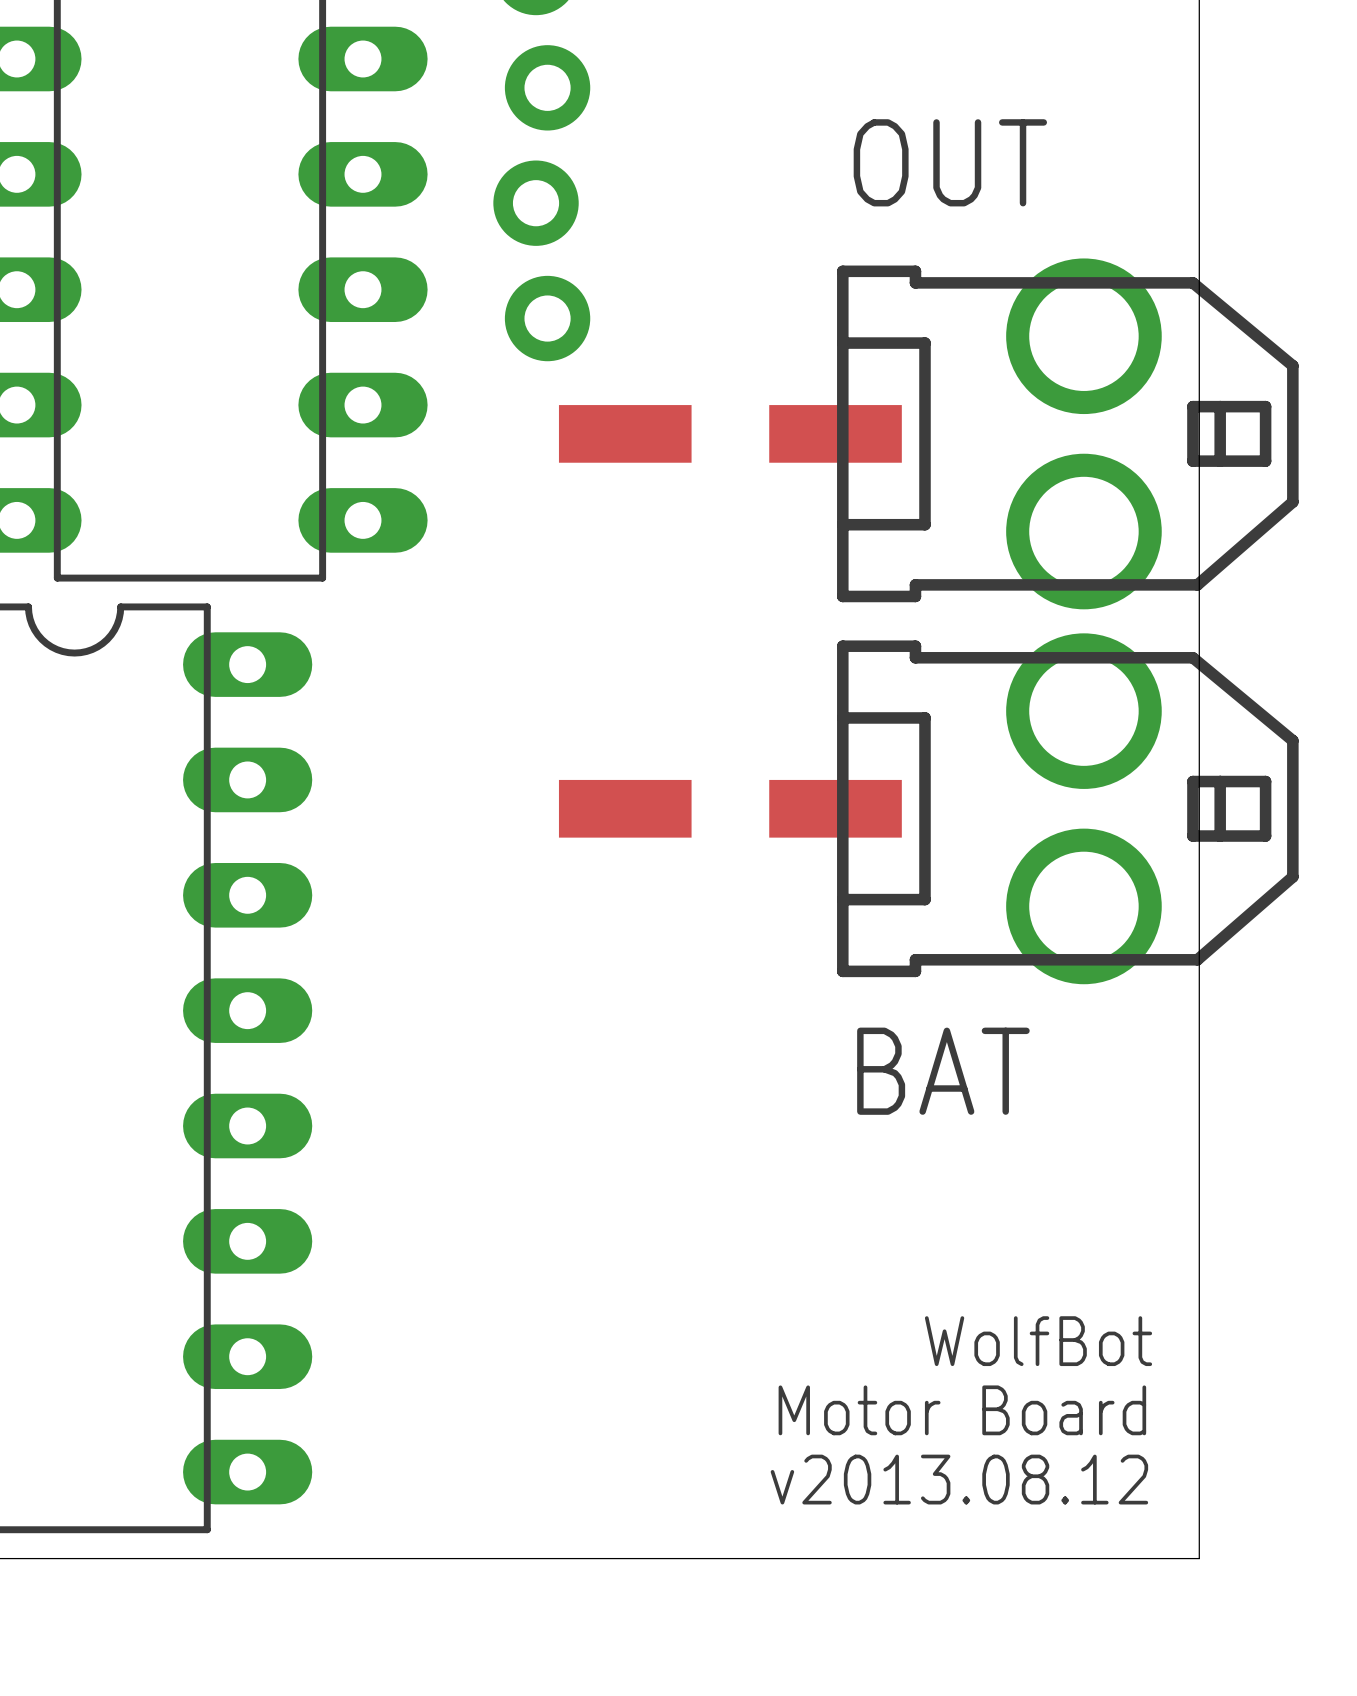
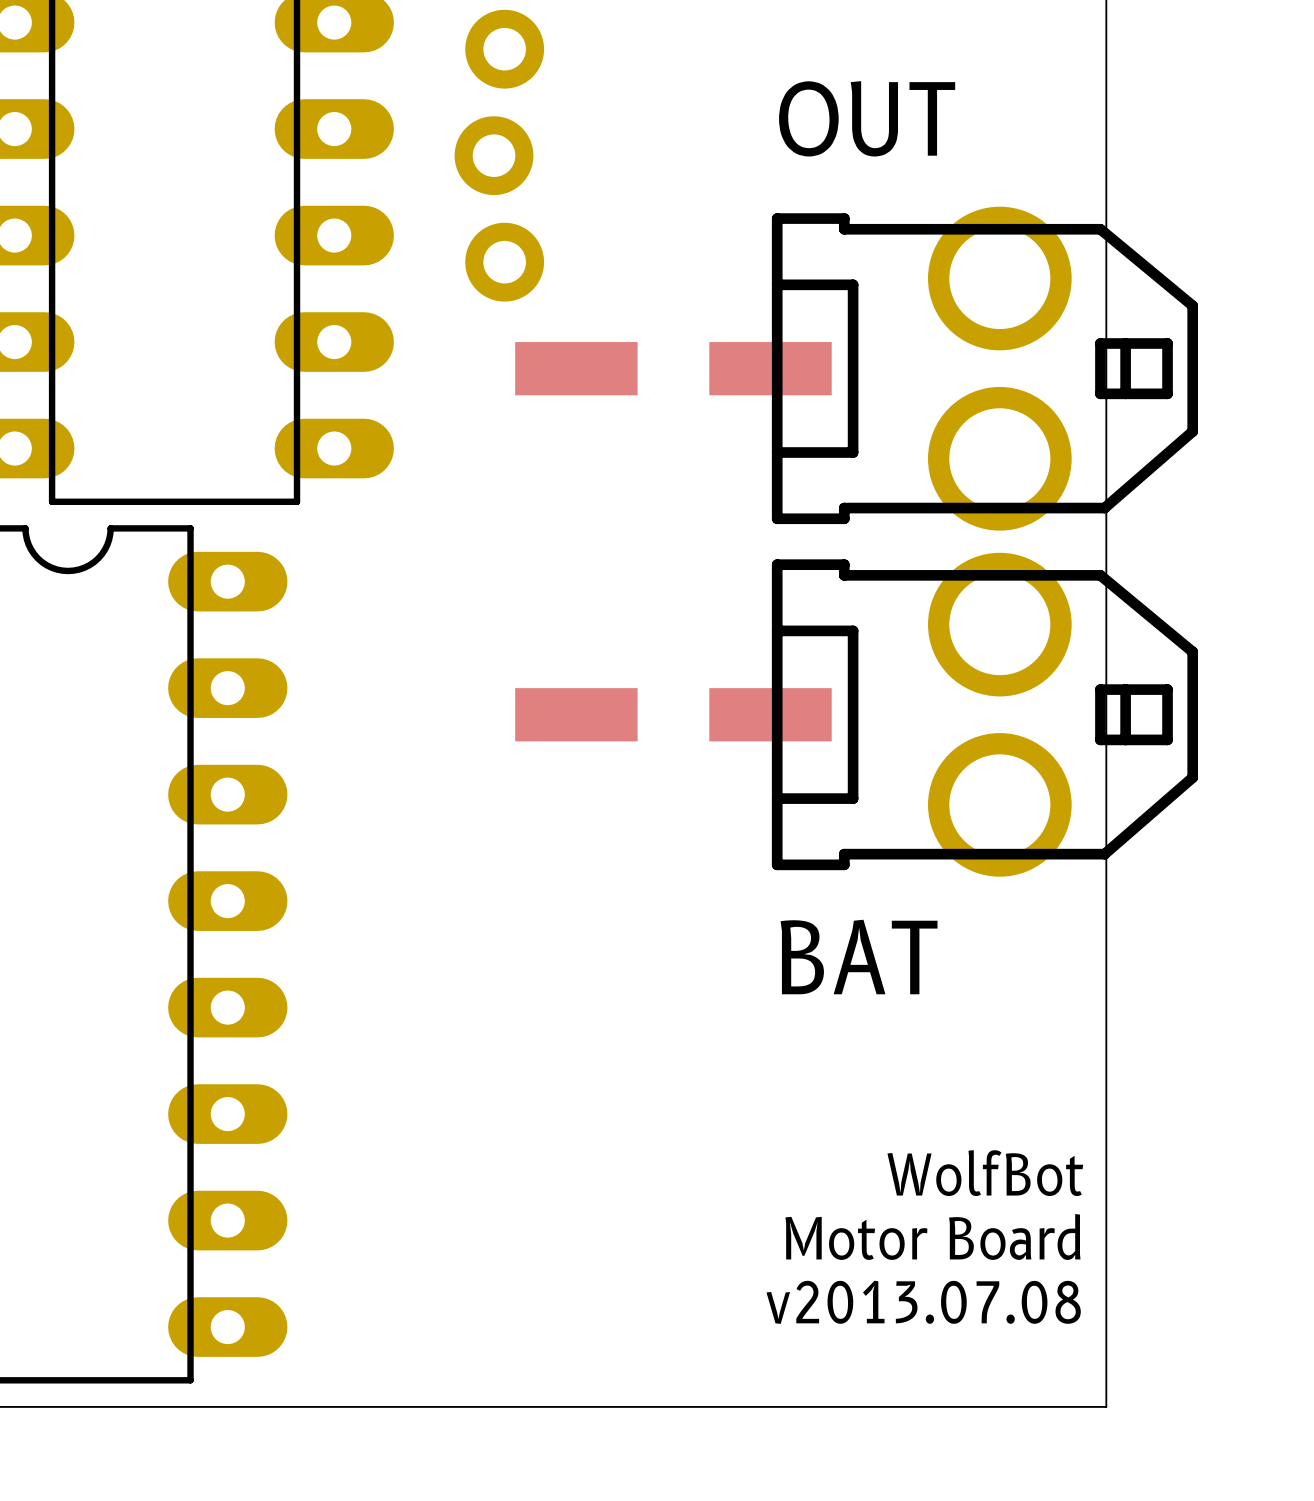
text position: WolfBot (1038, 1341) -> WolfBot (985, 1173)
text position: Motor Board (962, 1410) -> Motor Board (932, 1236)
text: v2013.08.12 (959, 1479) -> v2013.07.08 (923, 1302)

